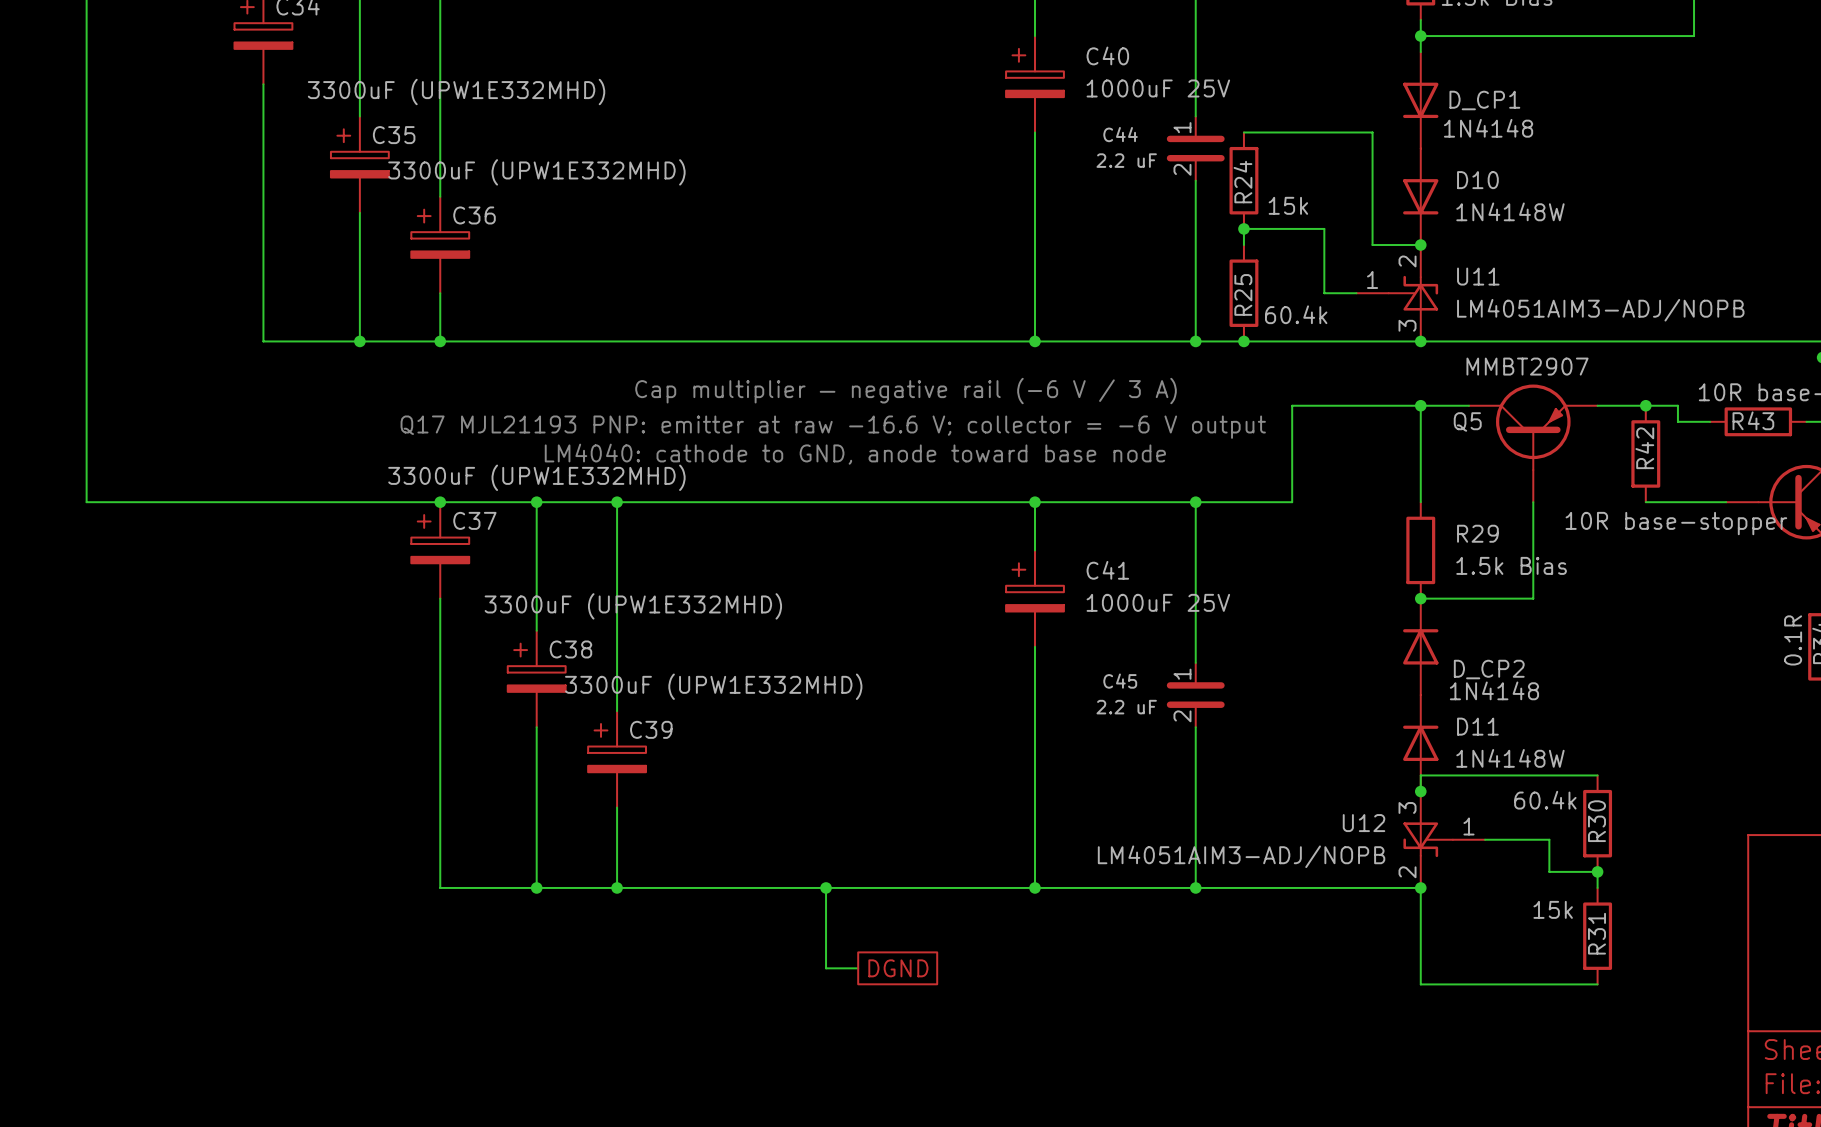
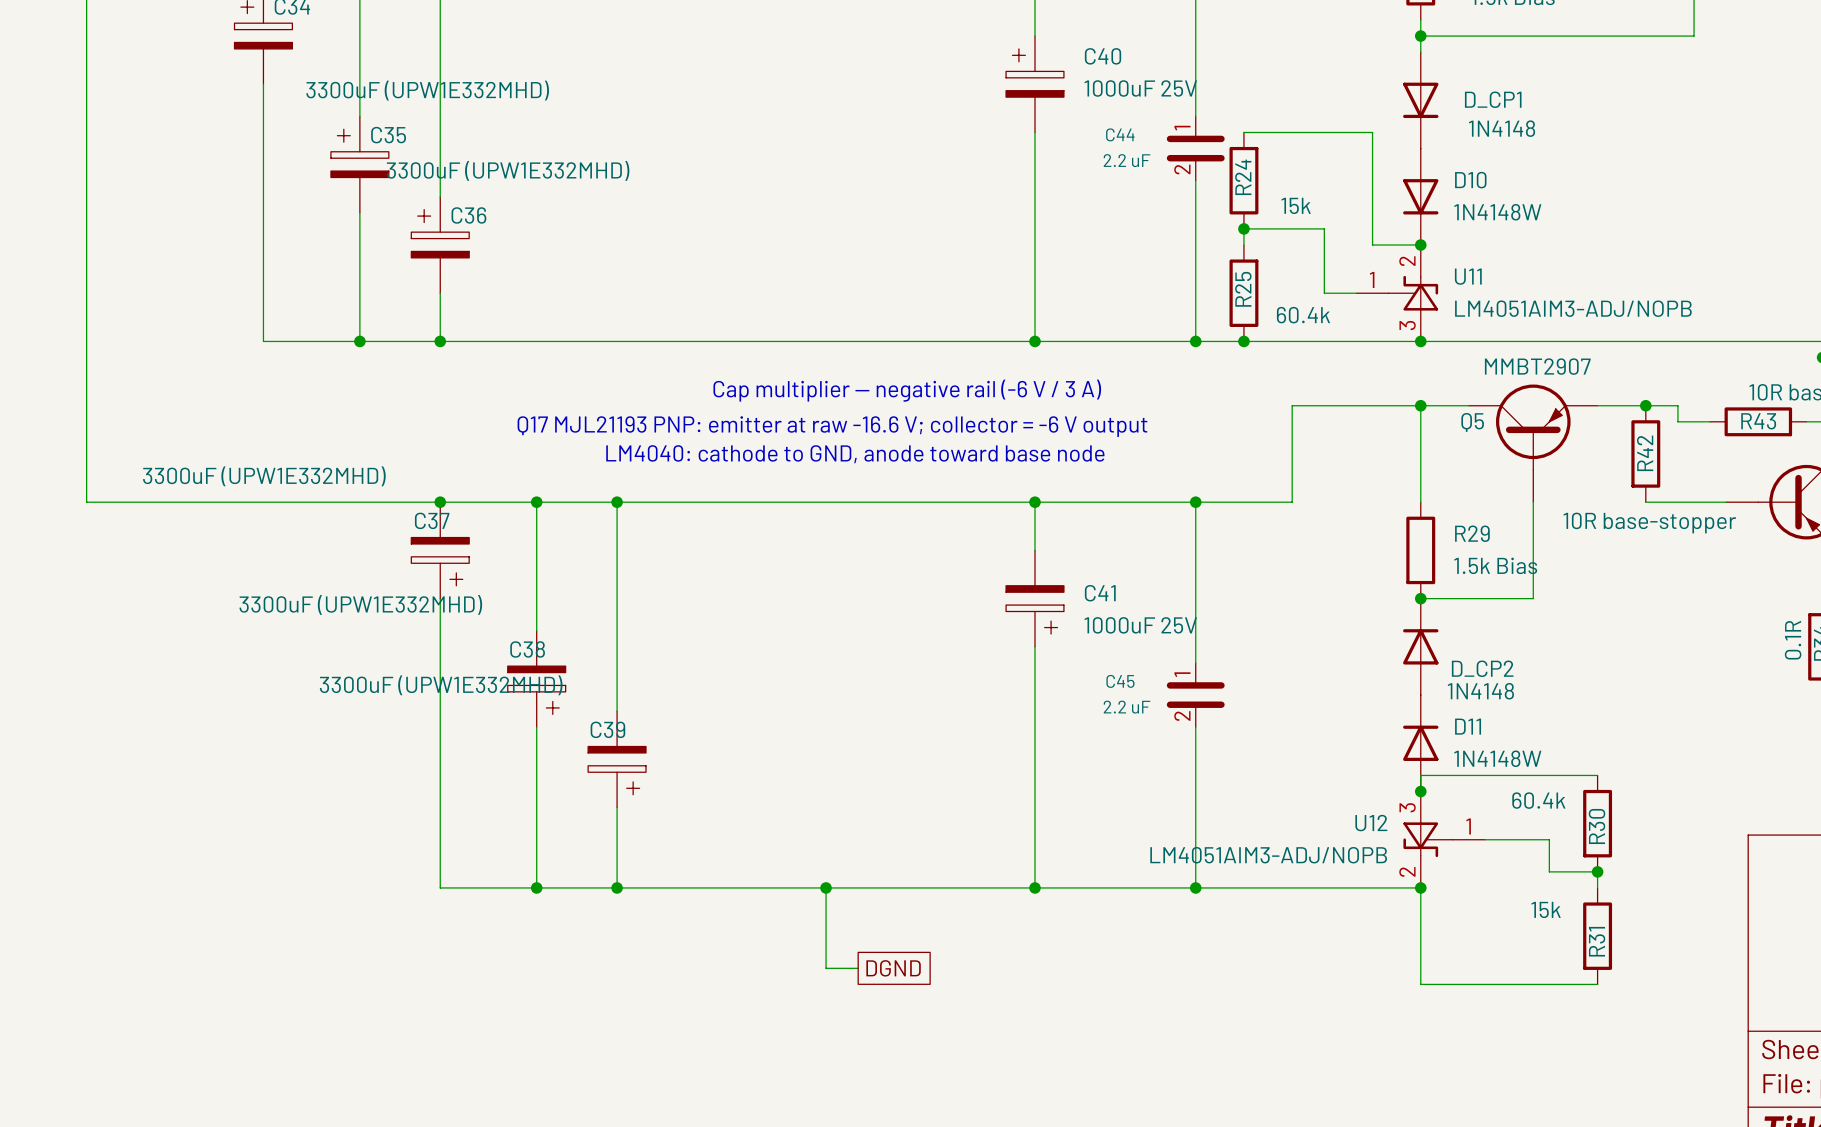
C37 value position: 3300uF (UPW1E332MHD) (536, 477) -> 3300uF (UPW1E332MHD) (264, 476)
C37 name position: C37 (474, 520) -> C37 (432, 520)
C37 rotation: 0° (440, 539) -> 180° (440, 561)
C41 rotation: 0° (1034, 587) -> 180° (1034, 609)
C38 value position: 3300uF (UPW1E332MHD) (633, 606) -> 3300uF (UPW1E332MHD) (360, 604)
C38 name position: C38 (570, 649) -> C38 (527, 649)
C38 rotation: 0° (536, 667) -> 180° (536, 690)
C39 value position: 3300uF (UPW1E332MHD) (713, 686) -> 3300uF (UPW1E332MHD) (441, 685)
C39 name position: C39 (651, 729) -> C39 (607, 729)
C39 rotation: 0° (617, 748) -> 180° (617, 770)

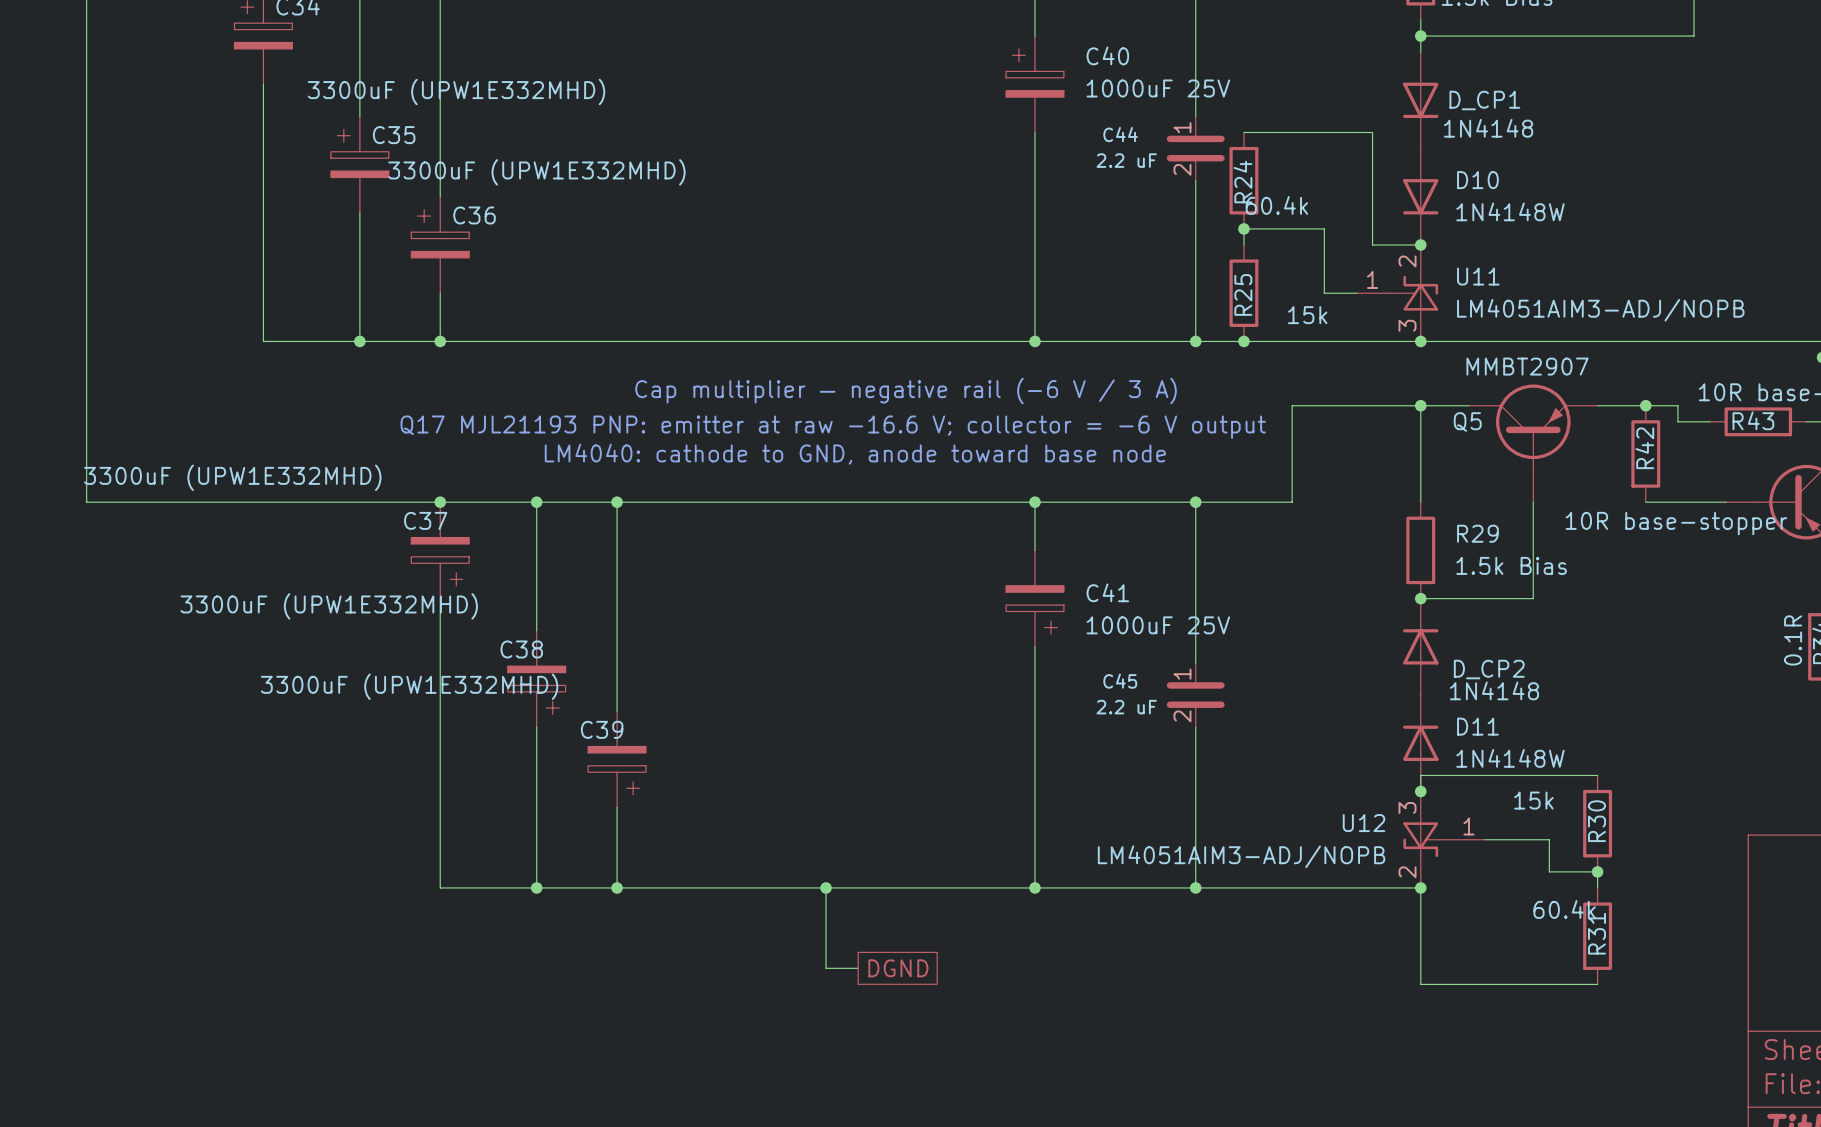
R24 value: 15k (1296, 205) -> 60.4k (1276, 205)
R25 value: 60.4k (1303, 315) -> 15k (1307, 315)
R30 value: 60.4k (1538, 800) -> 15k (1533, 800)
R31 value: 15k (1546, 909) -> 60.4k (1564, 909)

